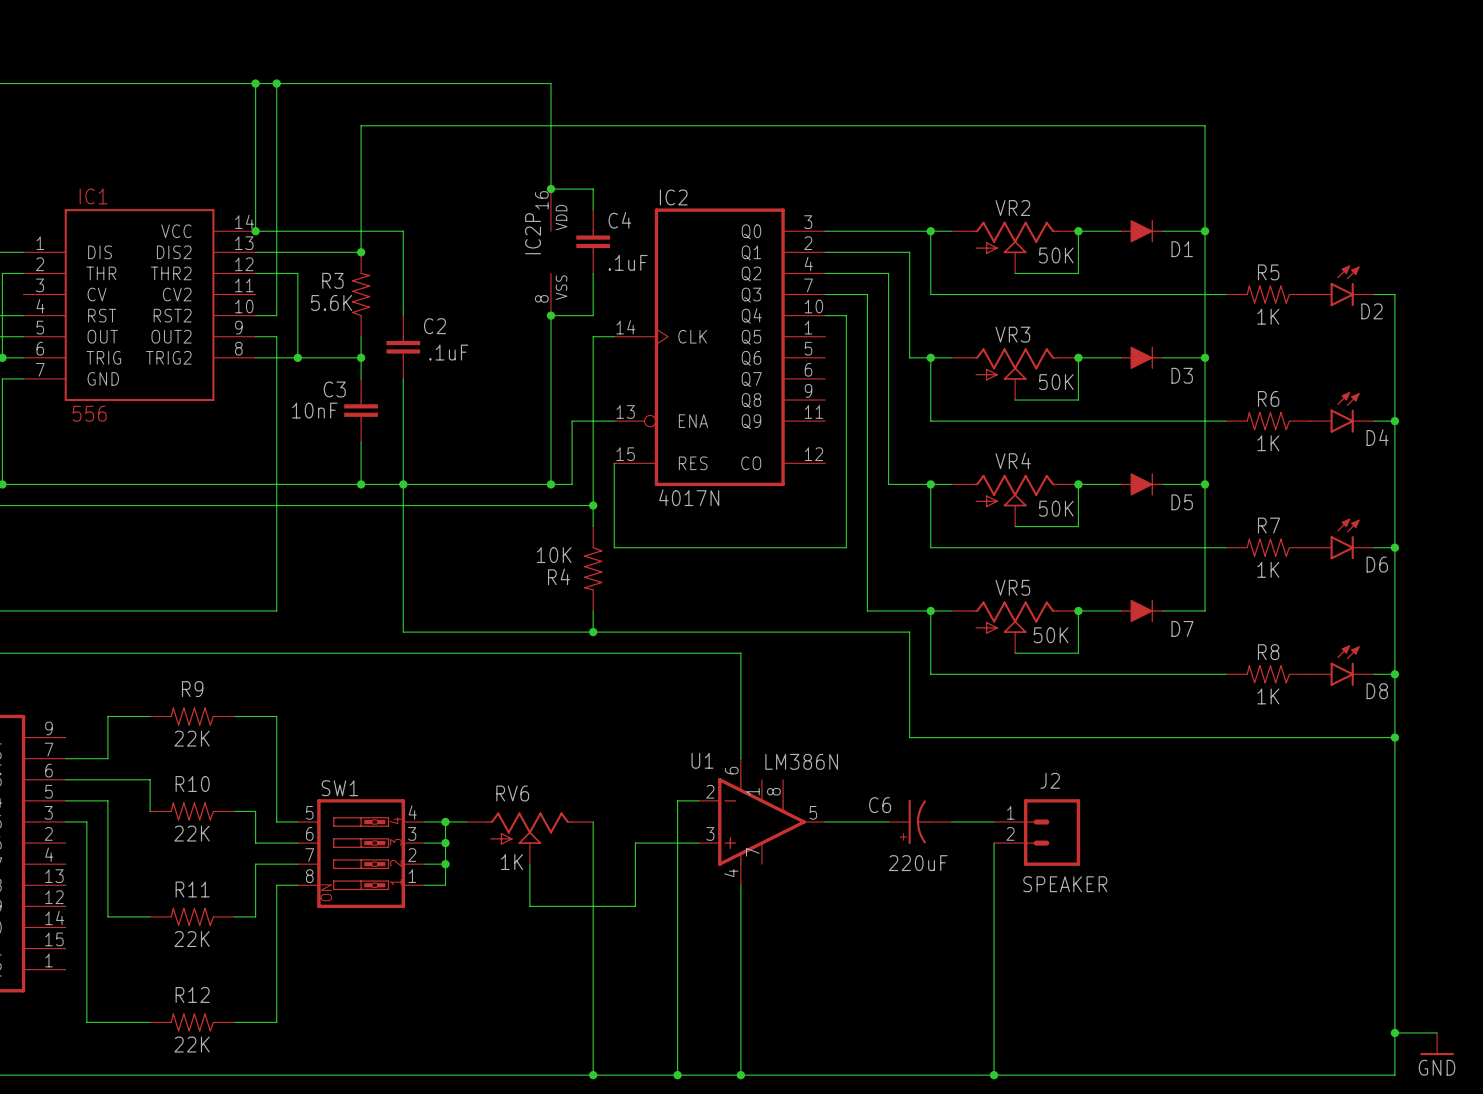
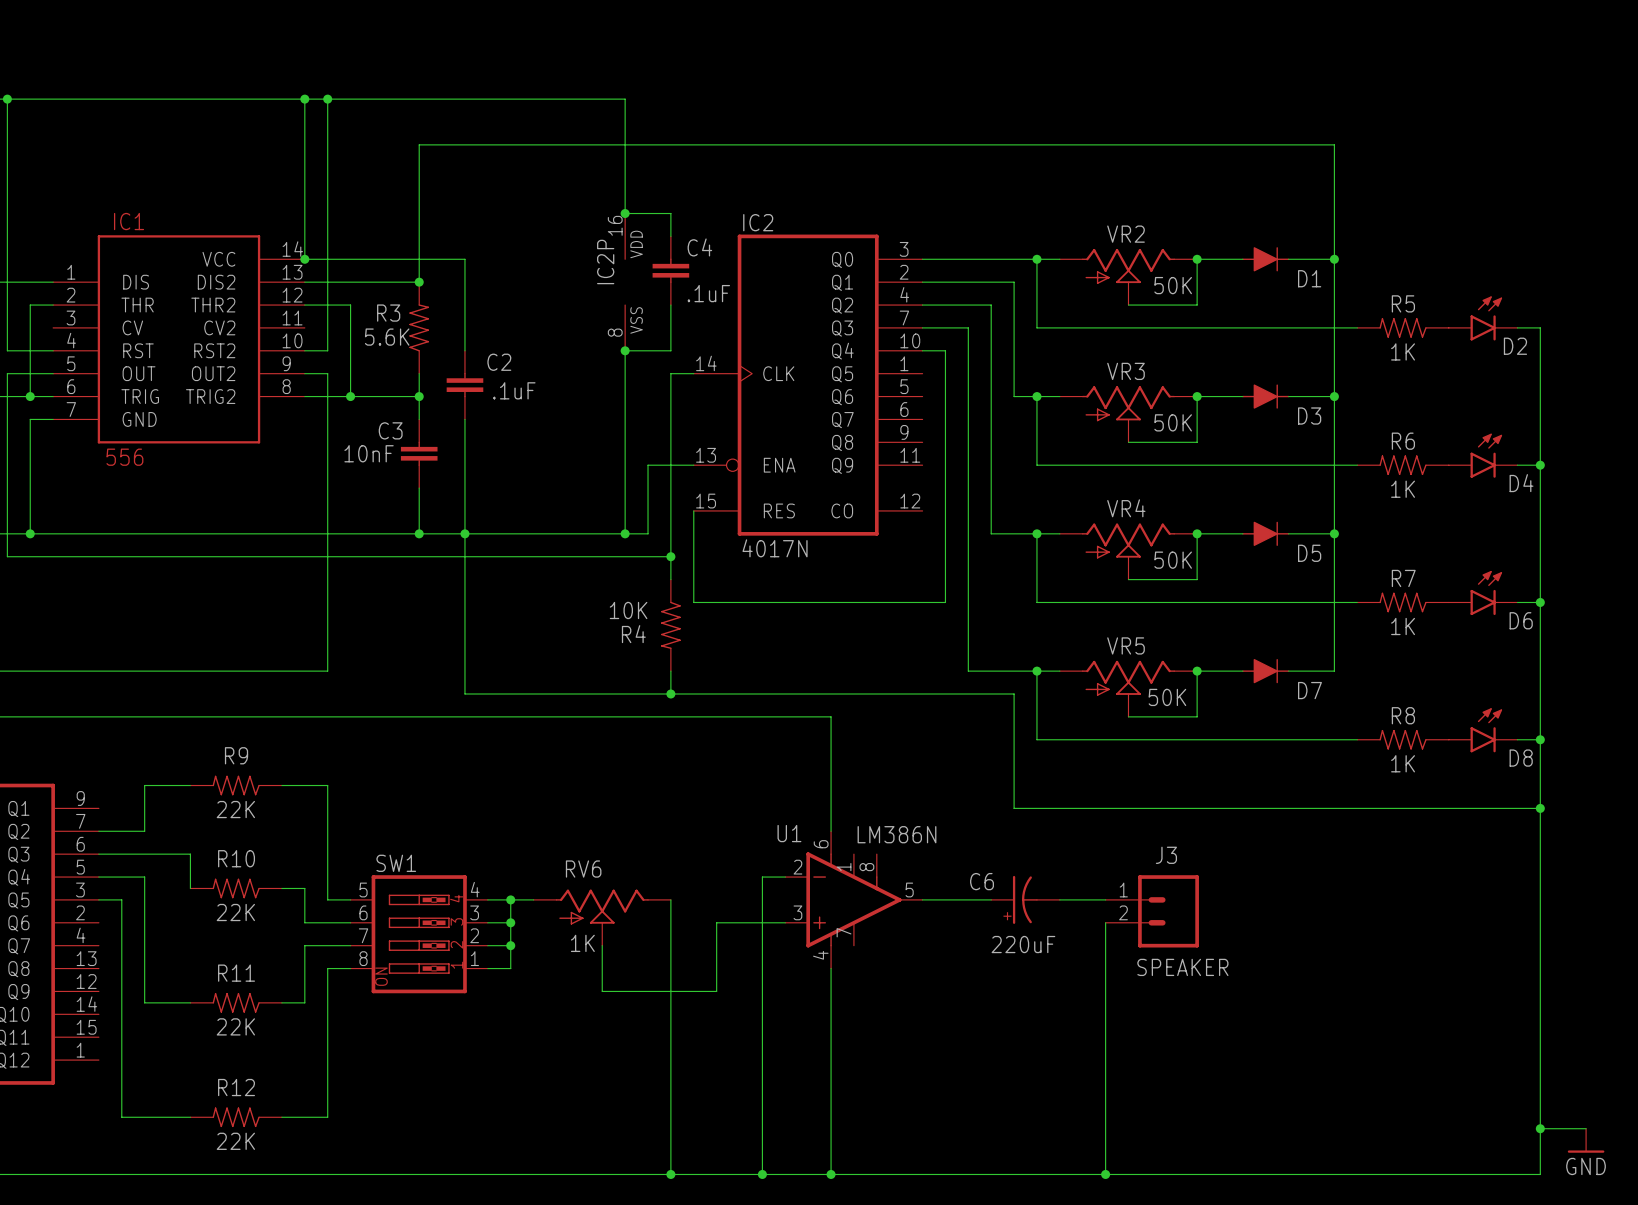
J2 name: J2 (1050, 780) -> J3 (1166, 855)

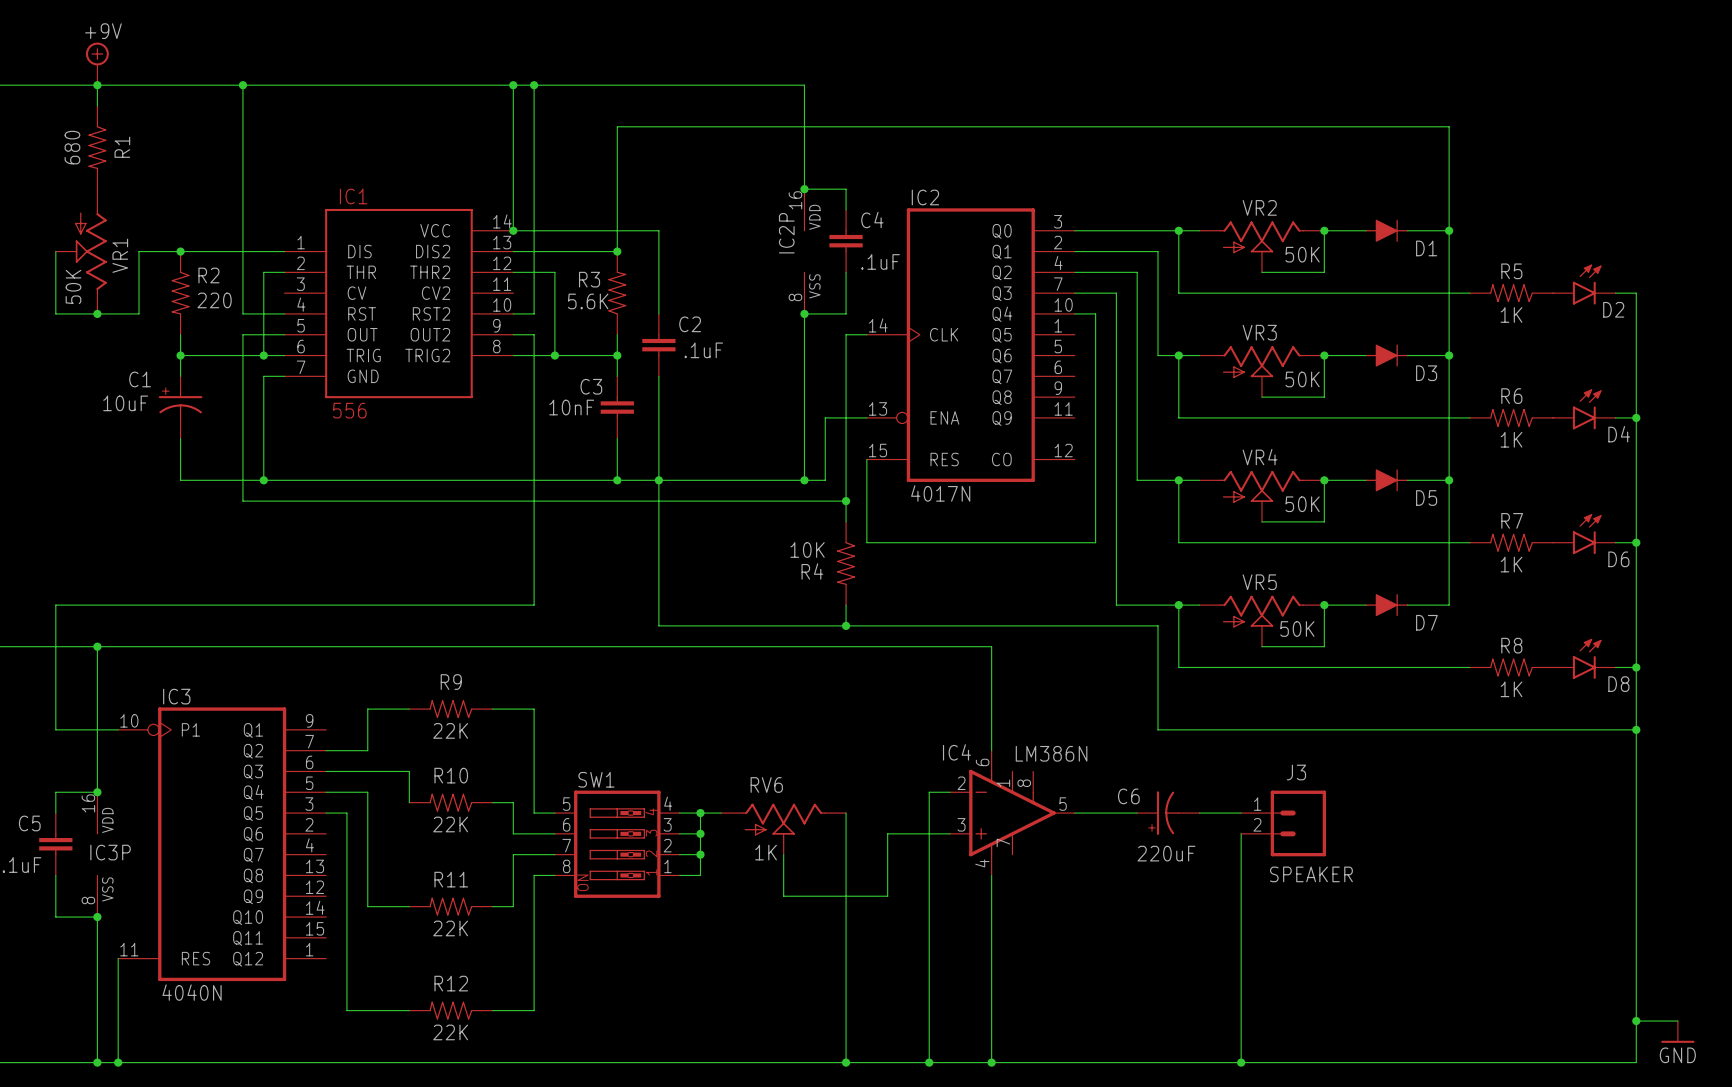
U1 name: U1 (789, 833) -> IC4 (956, 752)

